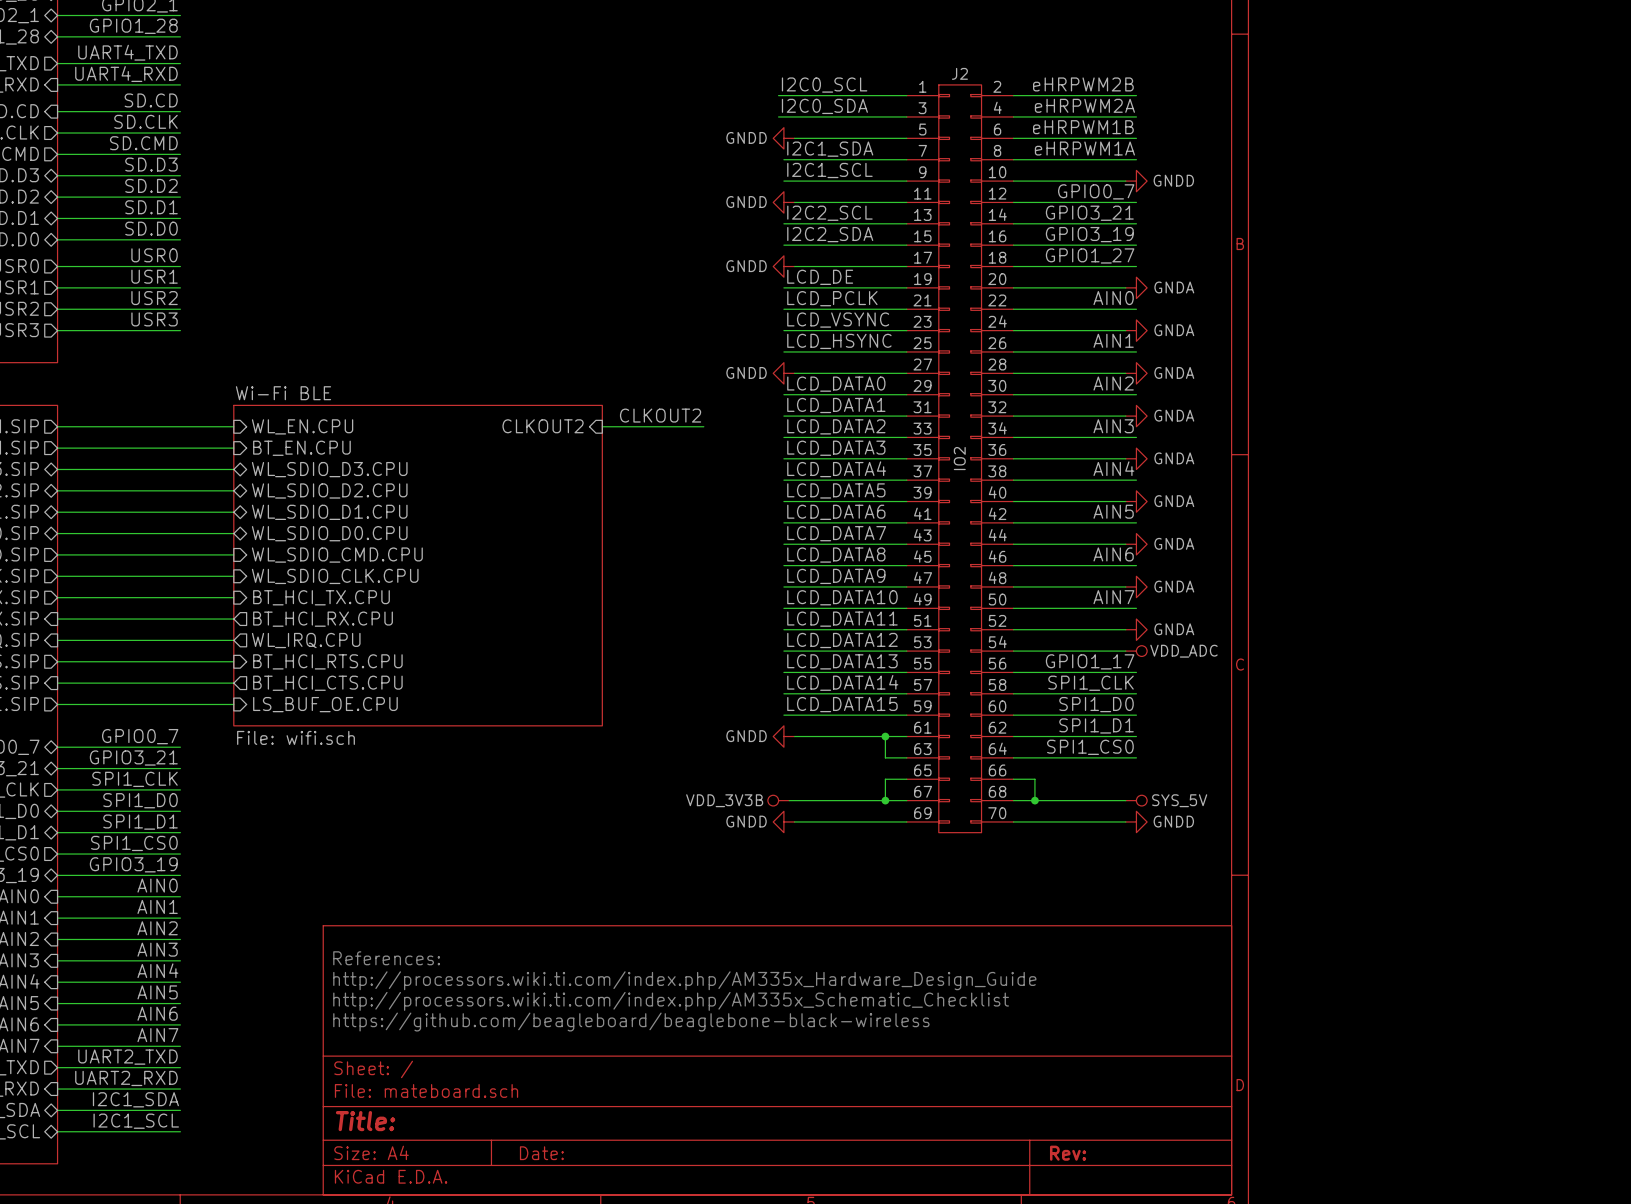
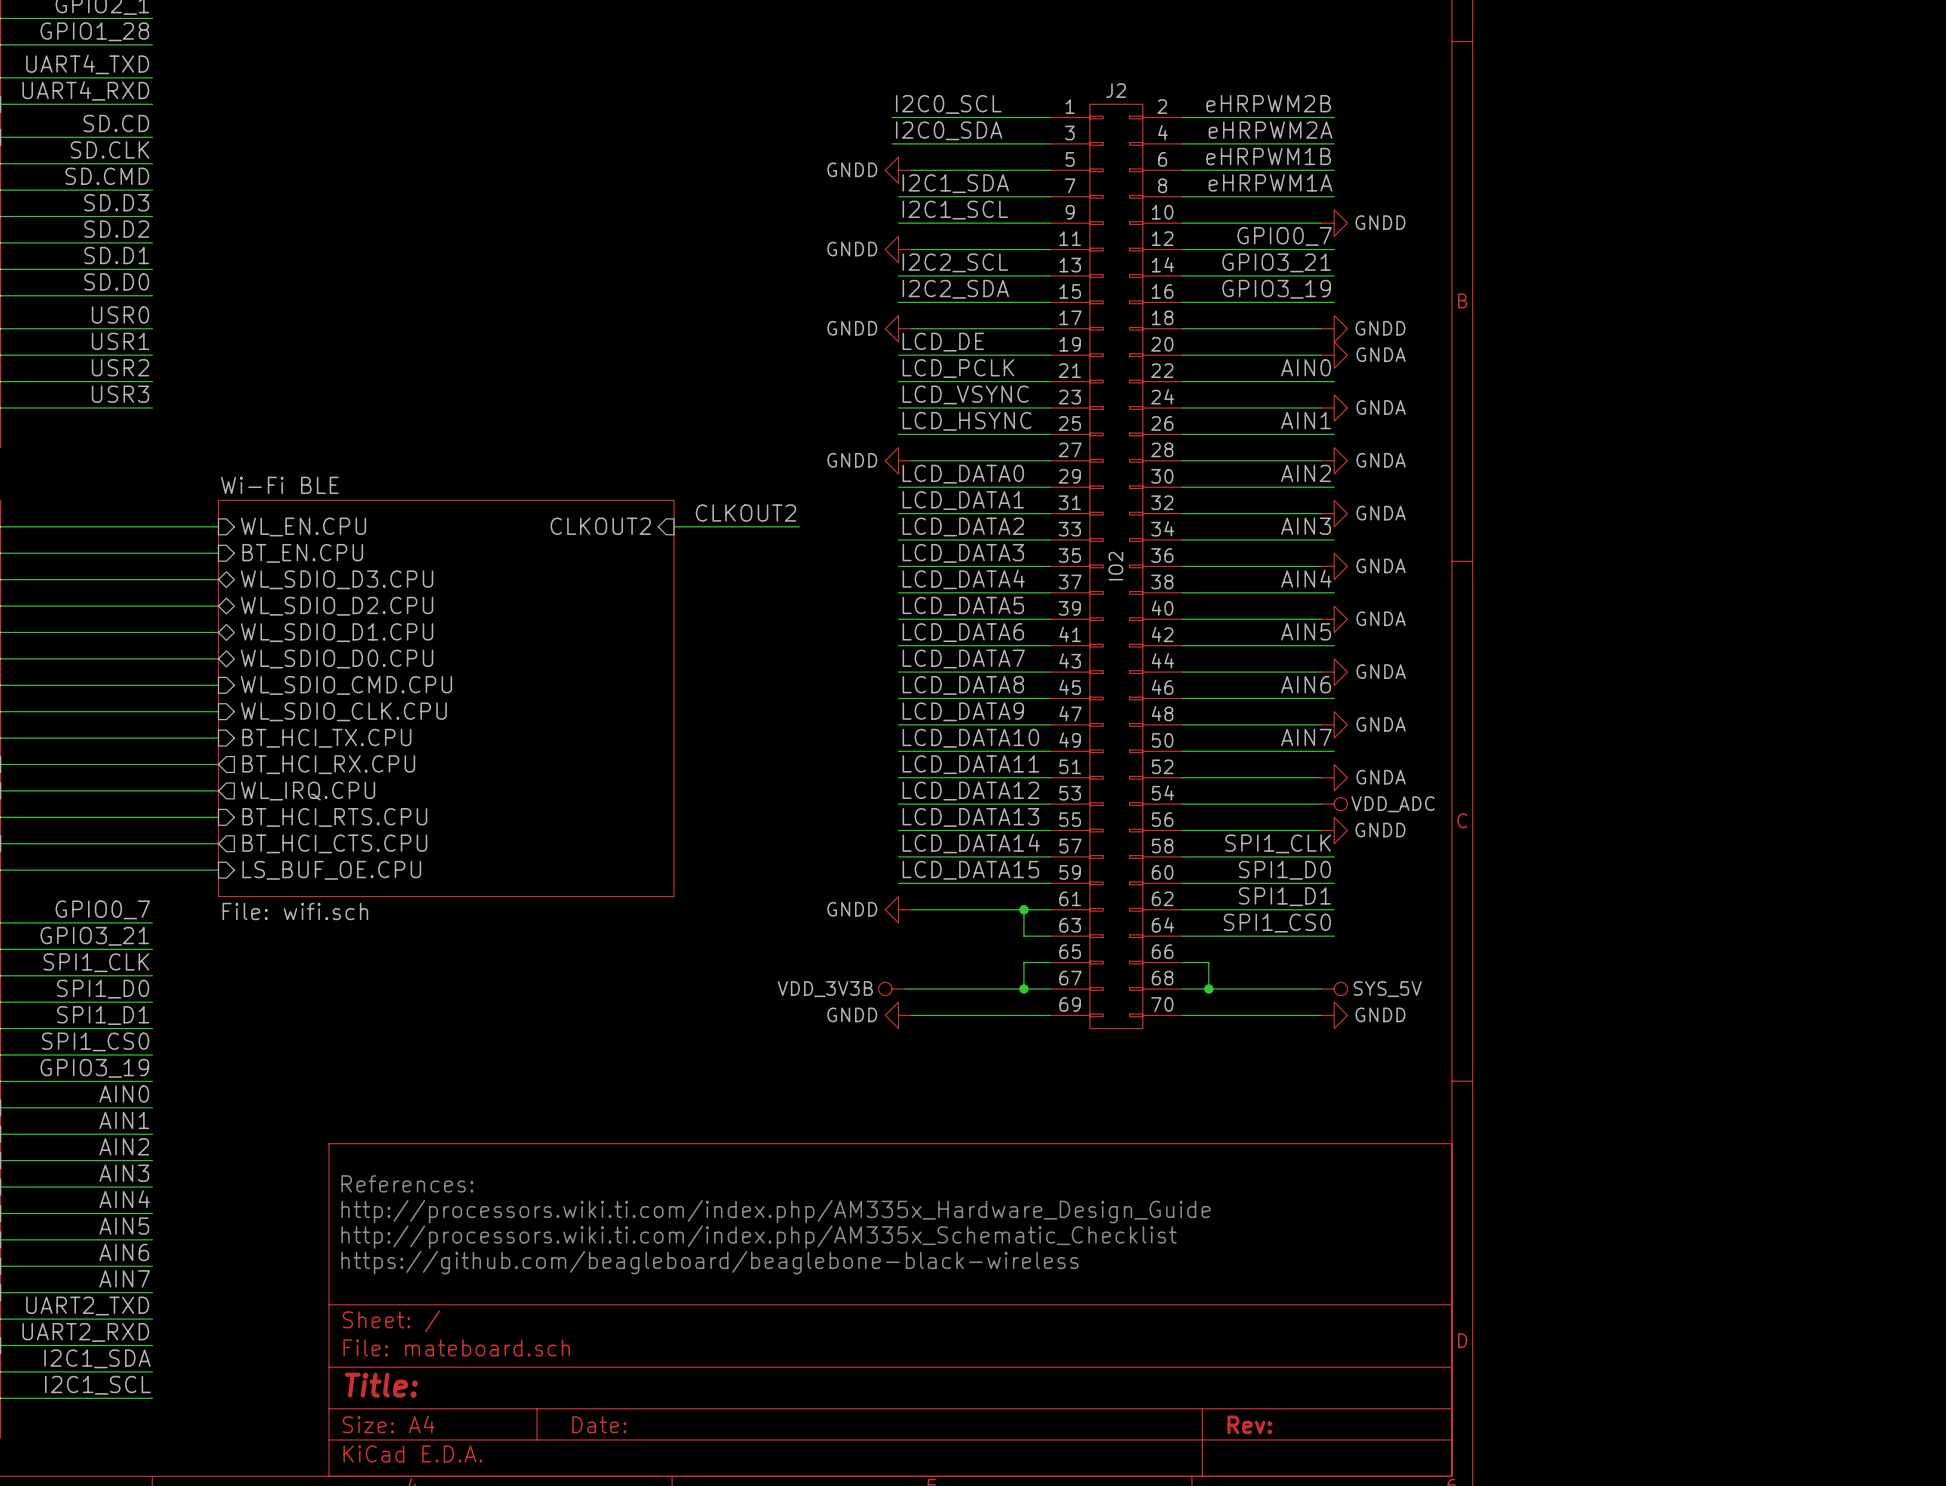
label: GPIO1_27 (1090, 255) -> none
power symbol: none -> GNDD (1334, 328)
label: GPIO1_17 (1090, 661) -> none
power symbol: none -> GNDD (1334, 830)

